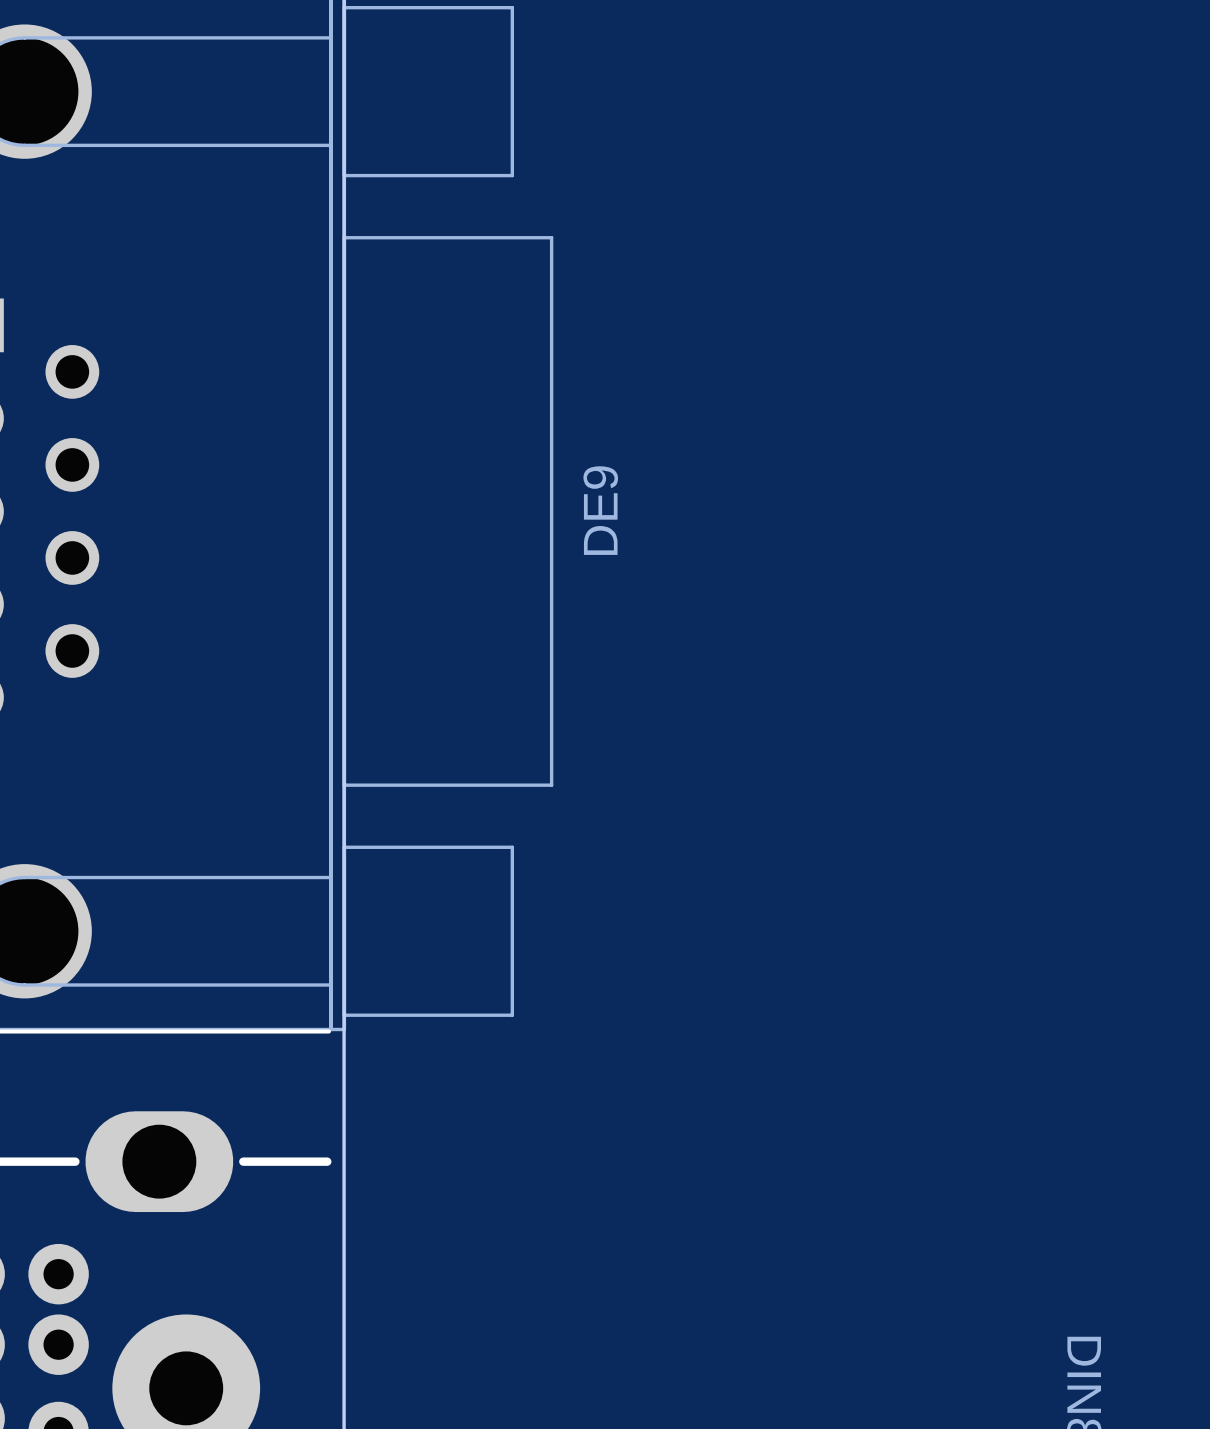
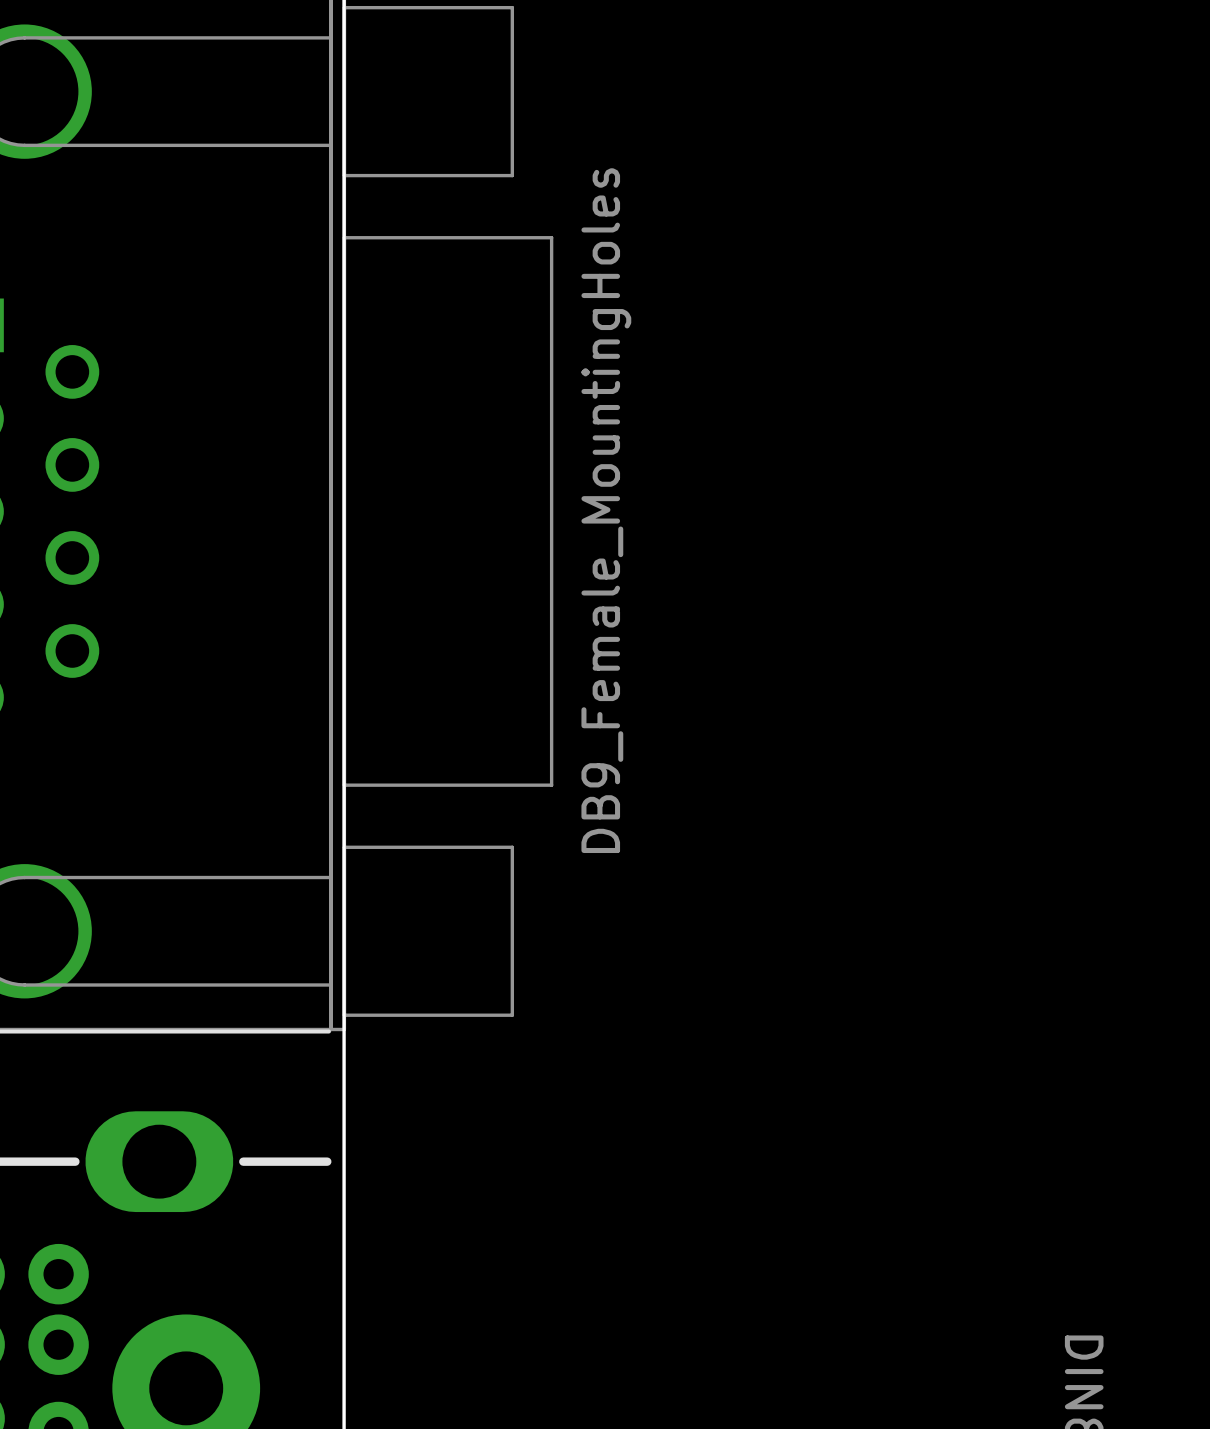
part value: DE9 (600, 510) -> DB9_Female_MountingHoles (606, 510)

